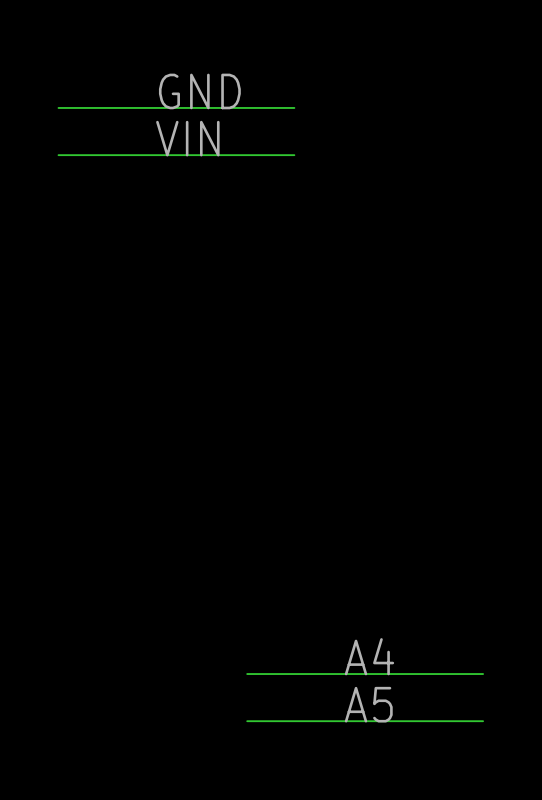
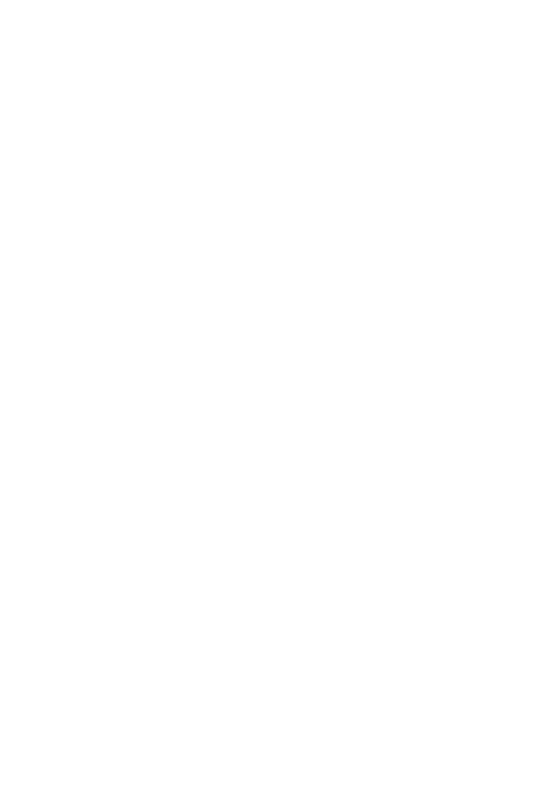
label: GND (199, 91) -> none
wire: (58, 107) (294, 107) -> none
label: VIN (187, 138) -> none
wire: (58, 155) (294, 155) -> none
label: A4 (369, 656) -> none
wire: (247, 674) (483, 674) -> none
label: A5 (368, 704) -> none
wire: (247, 721) (483, 721) -> none

